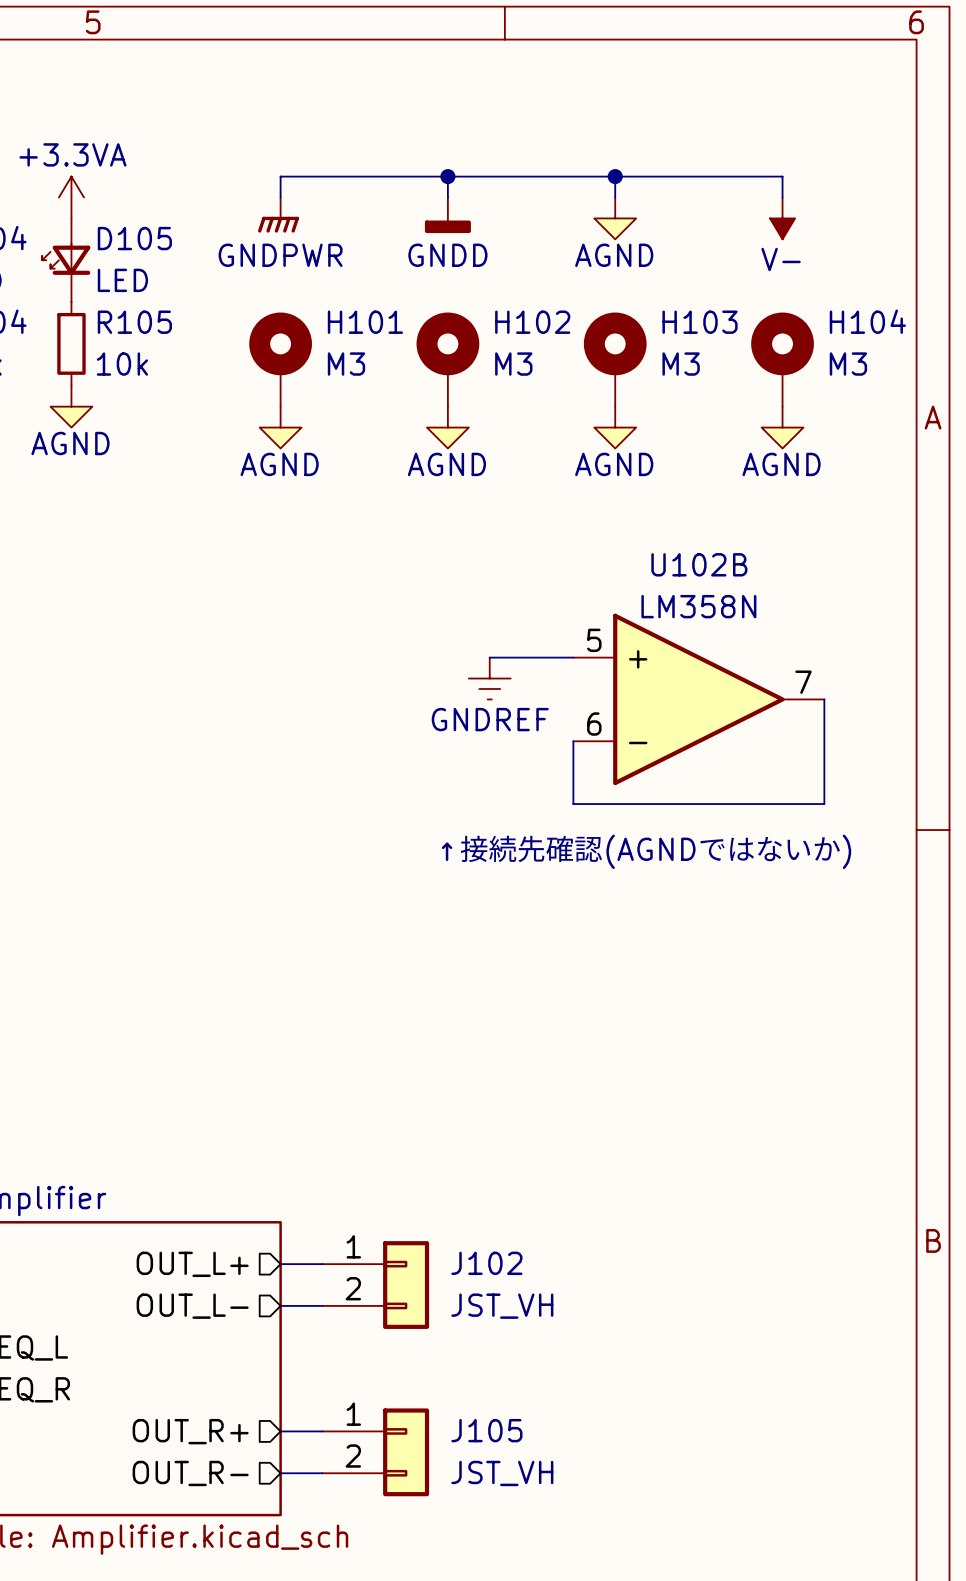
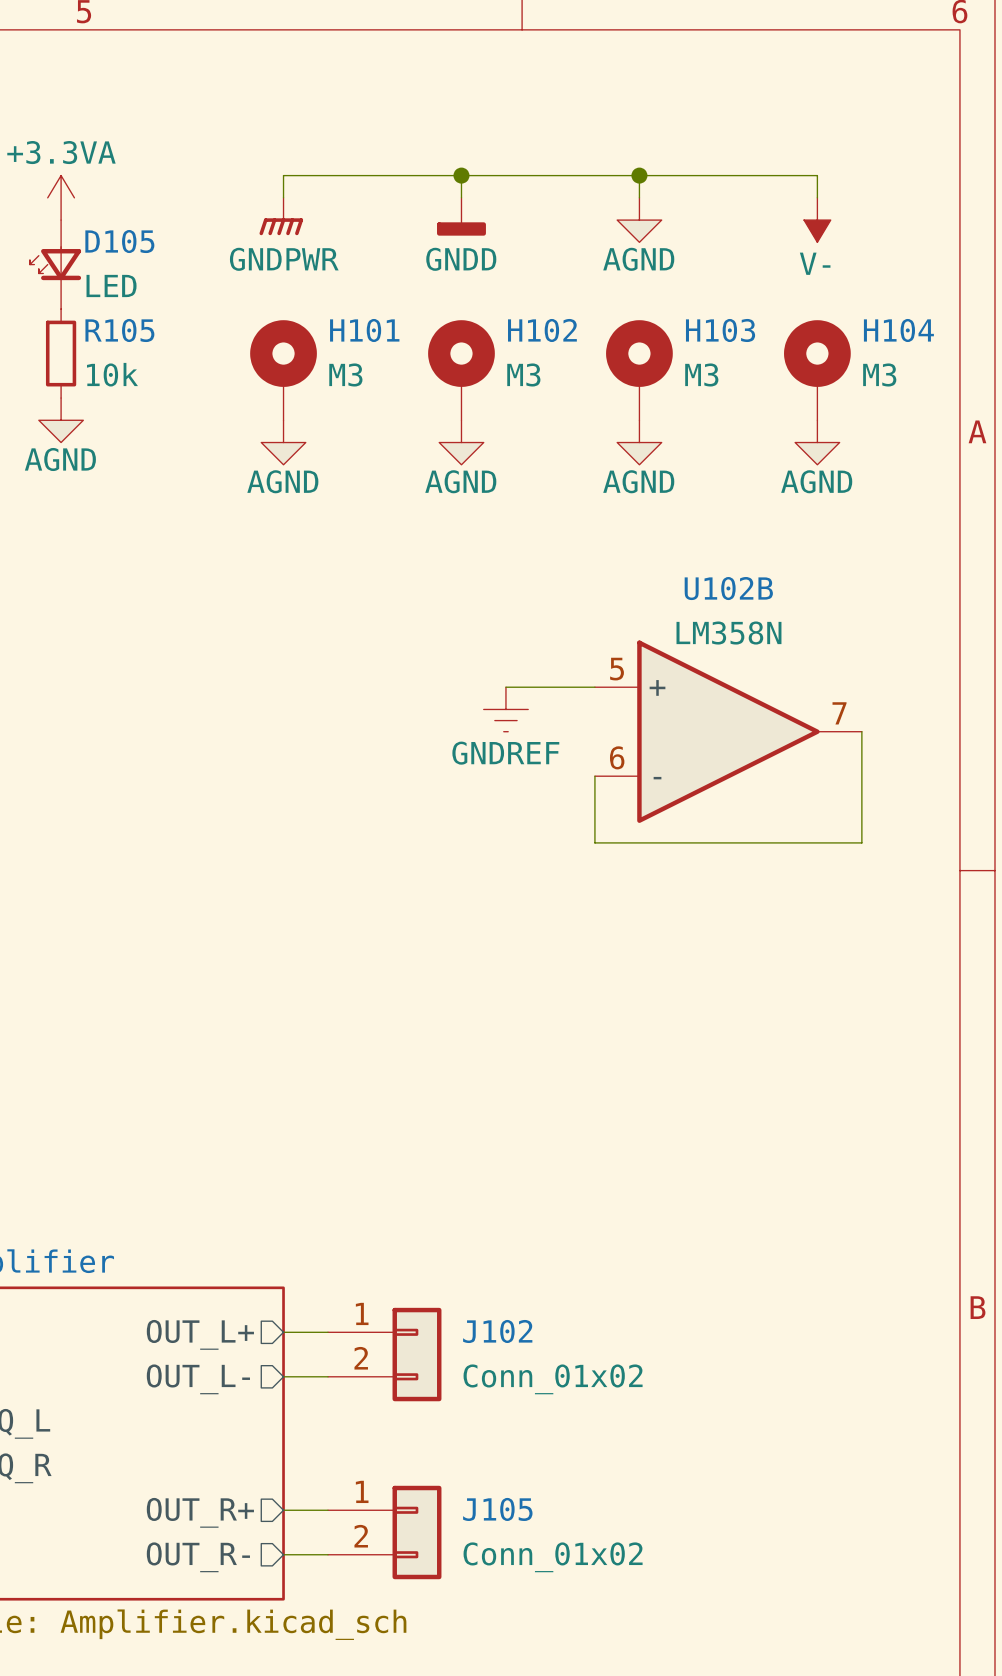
text: ↑接続先確認(AGNDではないか) (646, 851) -> none
J102 value: JST_VH (502, 1306) -> Conn_01x02 (553, 1379)
J105 value: JST_VH (502, 1473) -> Conn_01x02 (553, 1557)

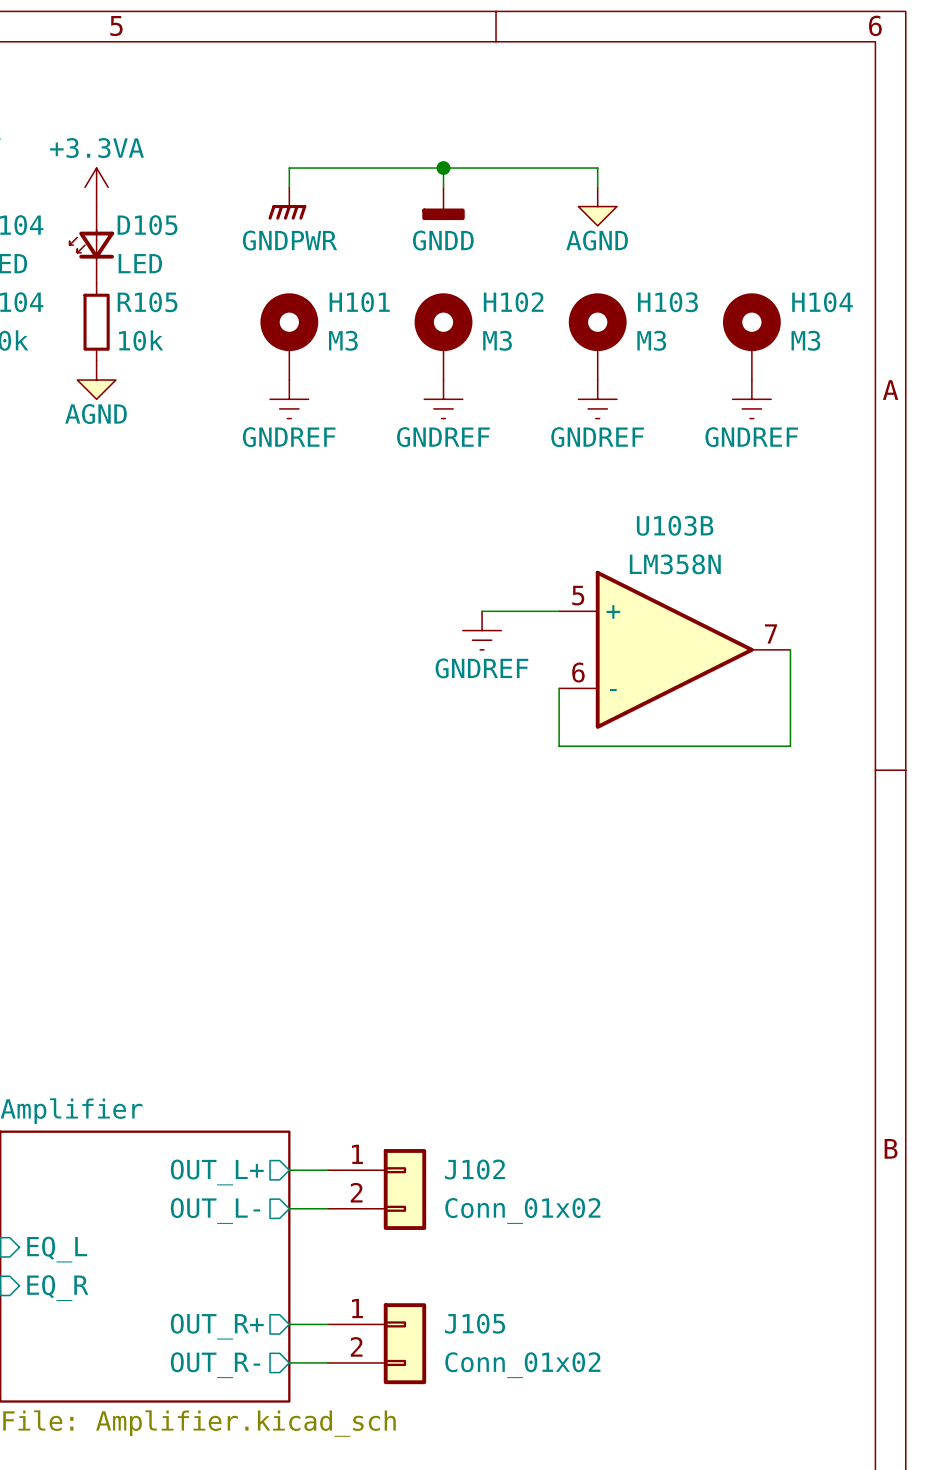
wire: (639, 175) (817, 175) (817, 197) -> none
junction: (639, 175) -> none
power symbol: V- (817, 220) -> none
power symbol: AGND (283, 442) -> GNDREF (289, 399)
power symbol: AGND (461, 442) -> GNDREF (443, 399)
power symbol: AGND (639, 442) -> GNDREF (597, 399)
power symbol: AGND (817, 442) -> GNDREF (751, 399)
U102B name: U102B (728, 588) -> U103B (675, 525)

